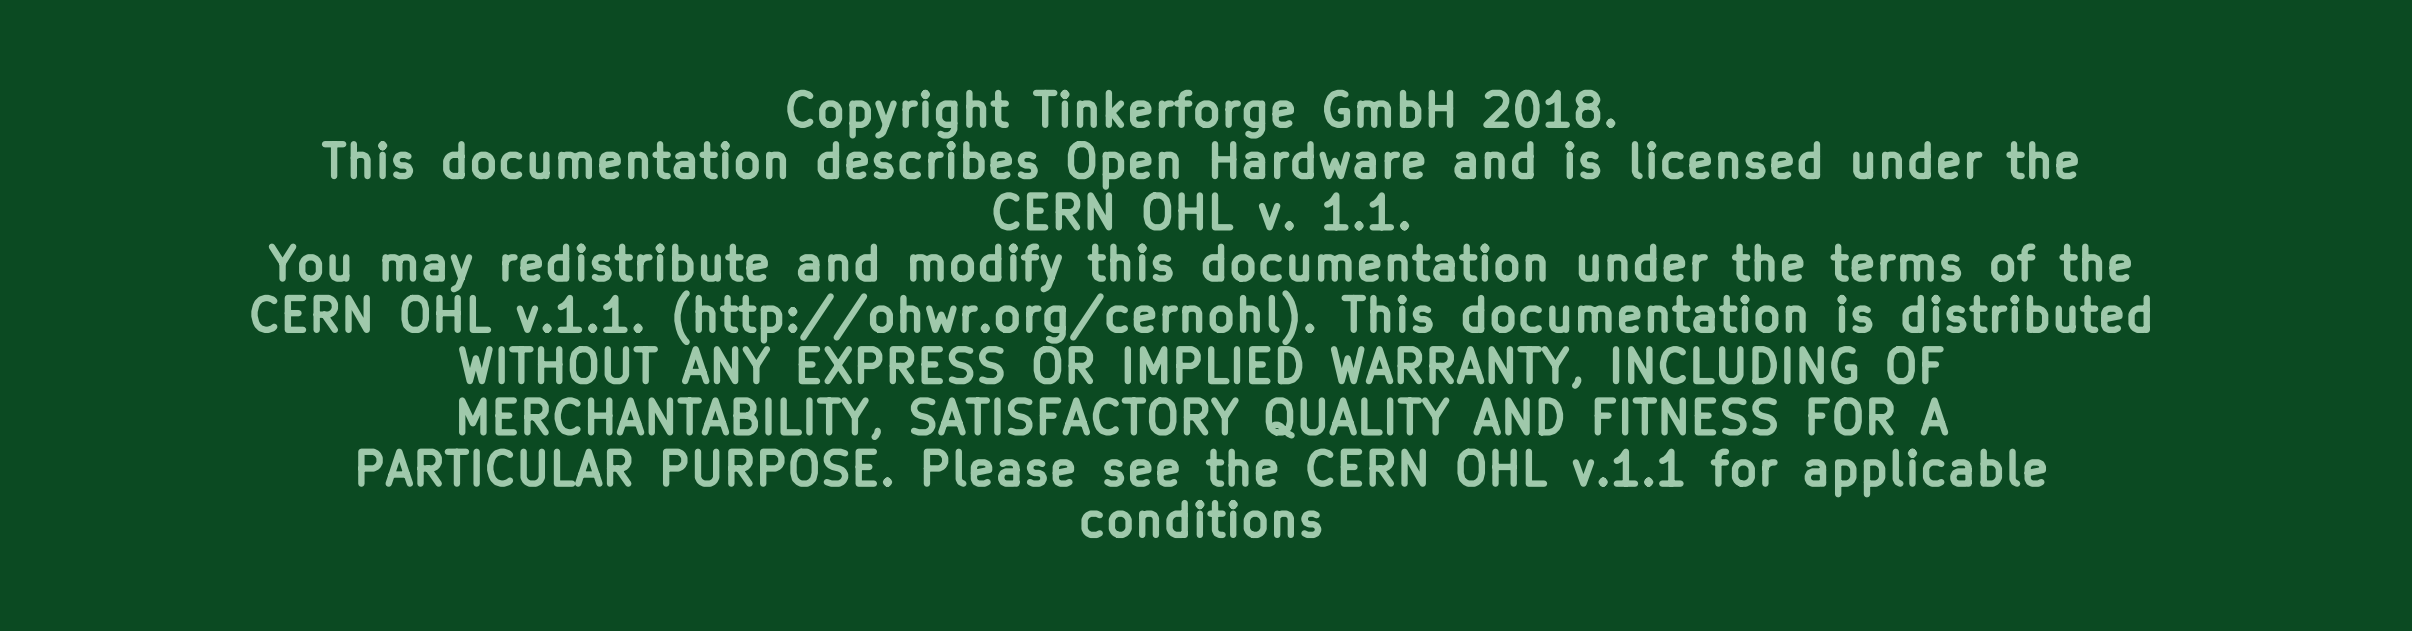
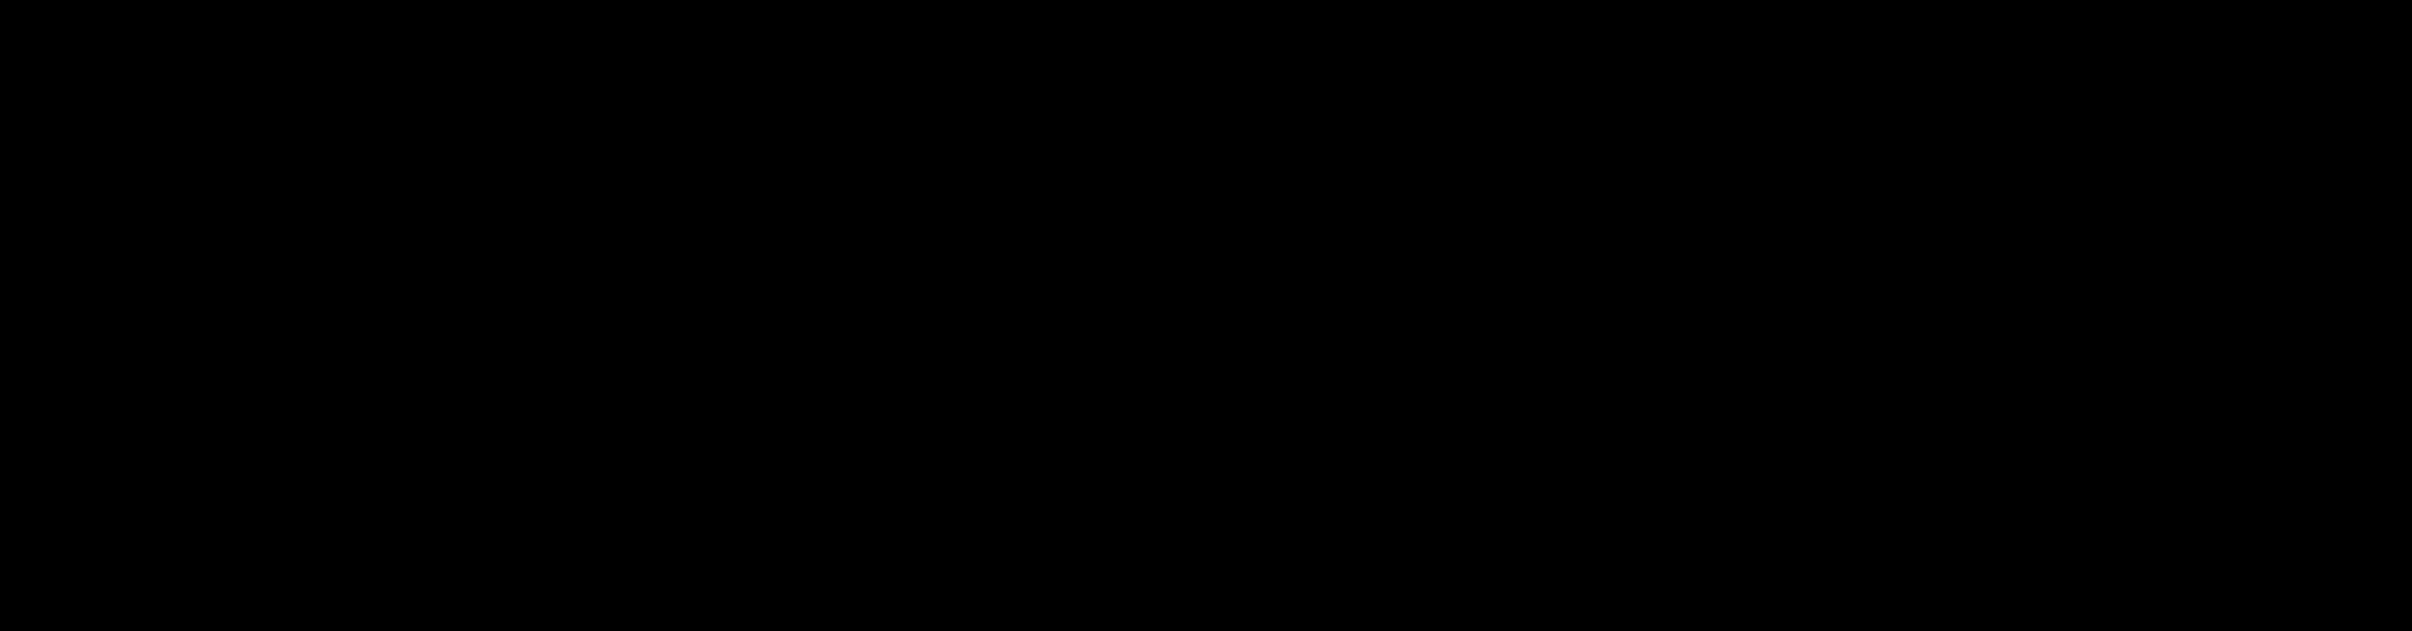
text: Copyright Tinkerforge GmbH 2018. (1201, 114) -> none
text: This documentation describes Open Hardware and is licensed under the (1199, 165) -> none
text: CERN OHL v. 1.1. (1201, 211) -> none
text: You may redistribute and modify this documentation under the terms of the (1199, 267) -> none
text: CERN OHL v.1.1. (http://ohwr.org/cernohl). This documentation is distributed (1200, 317) -> none
text: WITHOUT ANY EXPRESS OR IMPLIED WARRANTY, INCLUDING OF (1201, 367) -> none
text: MERCHANTABILITY, SATISFACTORY QUALITY AND FITNESS FOR A (1203, 418) -> none
text: PARTICULAR PURPOSE. Please see the CERN OHL v.1.1 for applicable (1202, 473) -> none
text: conditions (1201, 518) -> none

